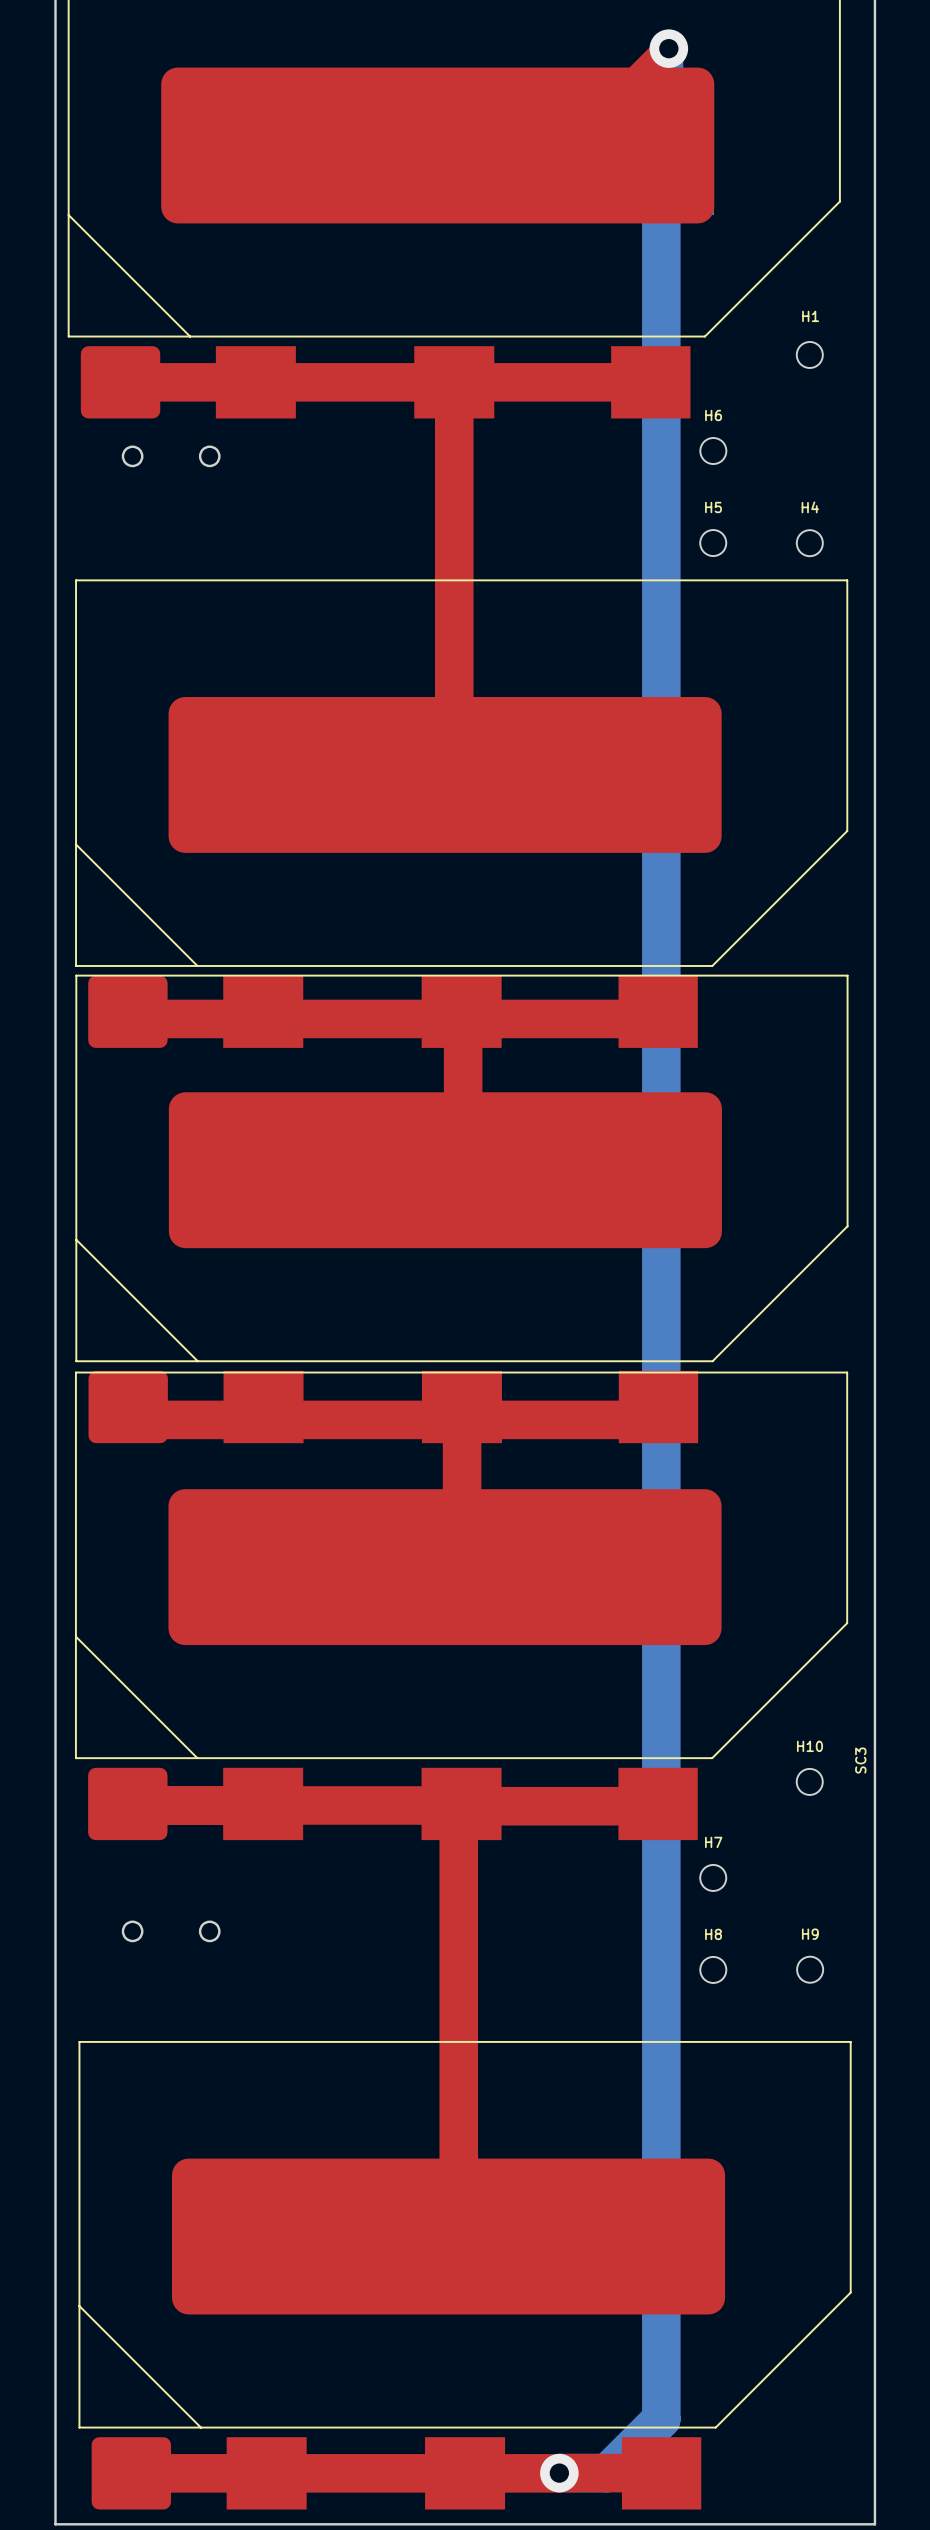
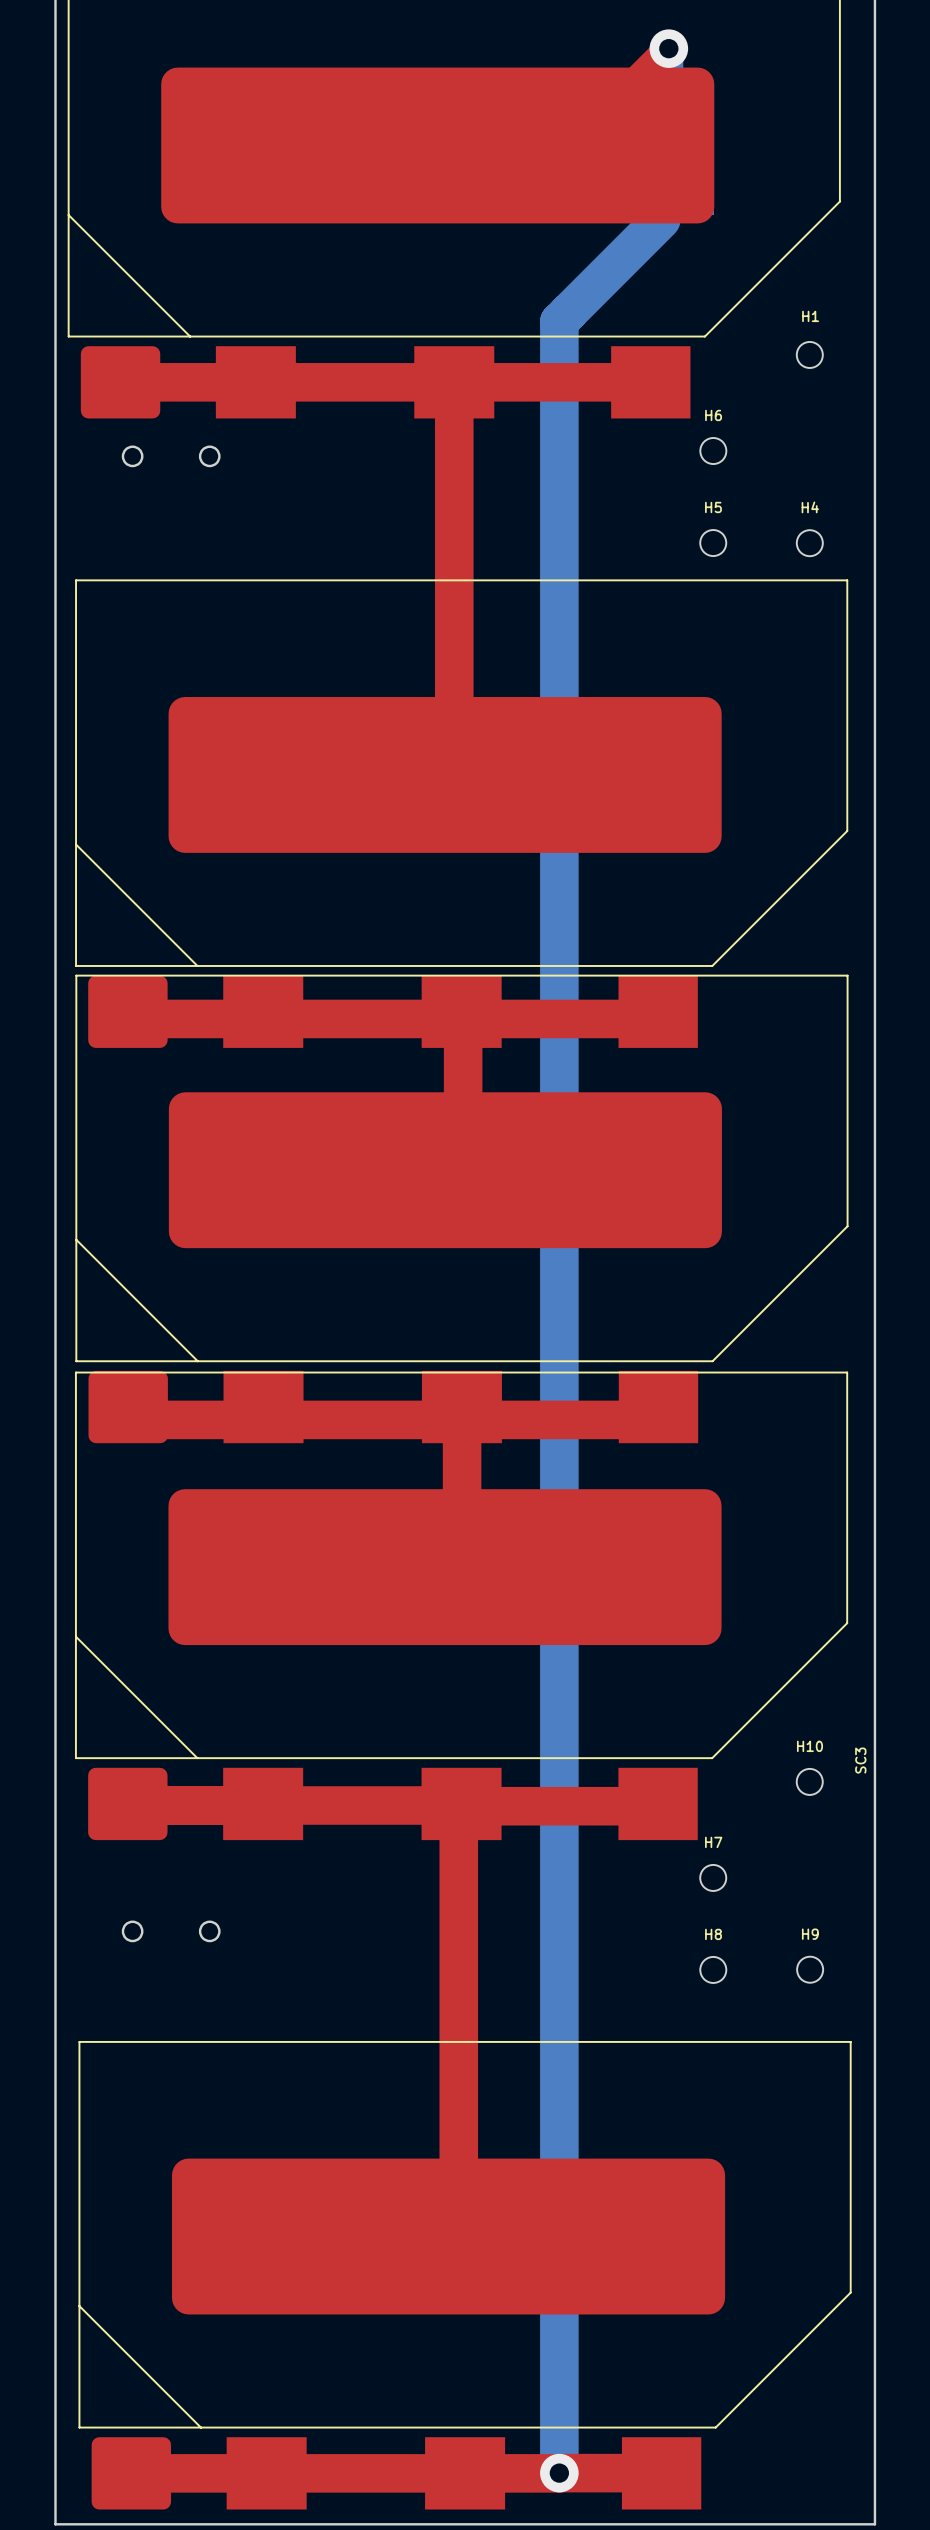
bottom track: (661, 219) (661, 2419) (607, 2473) (559, 2473) -> (661, 219) (559, 321) (559, 2473)

